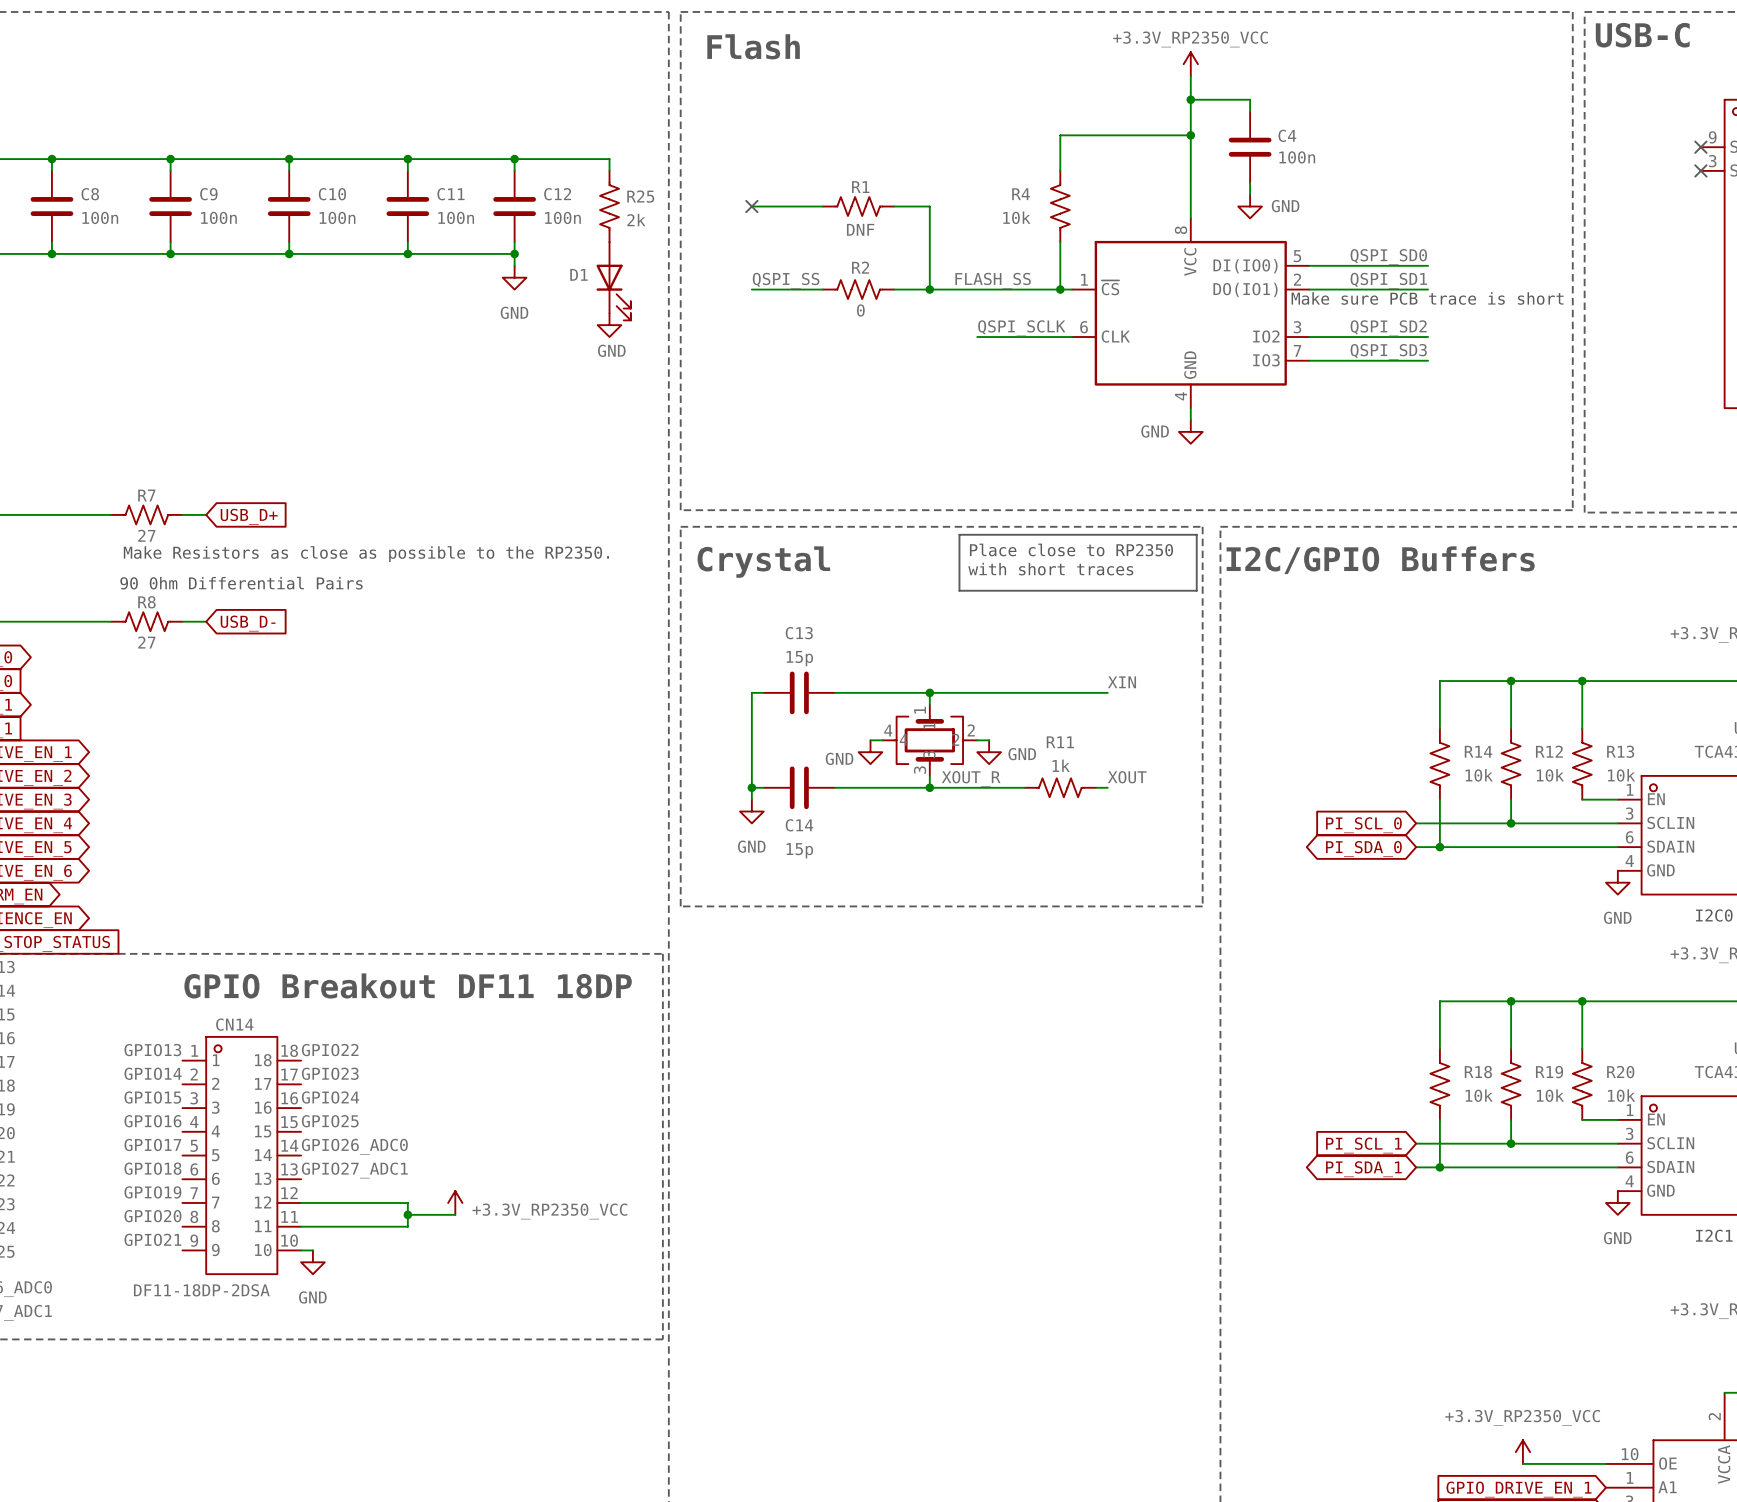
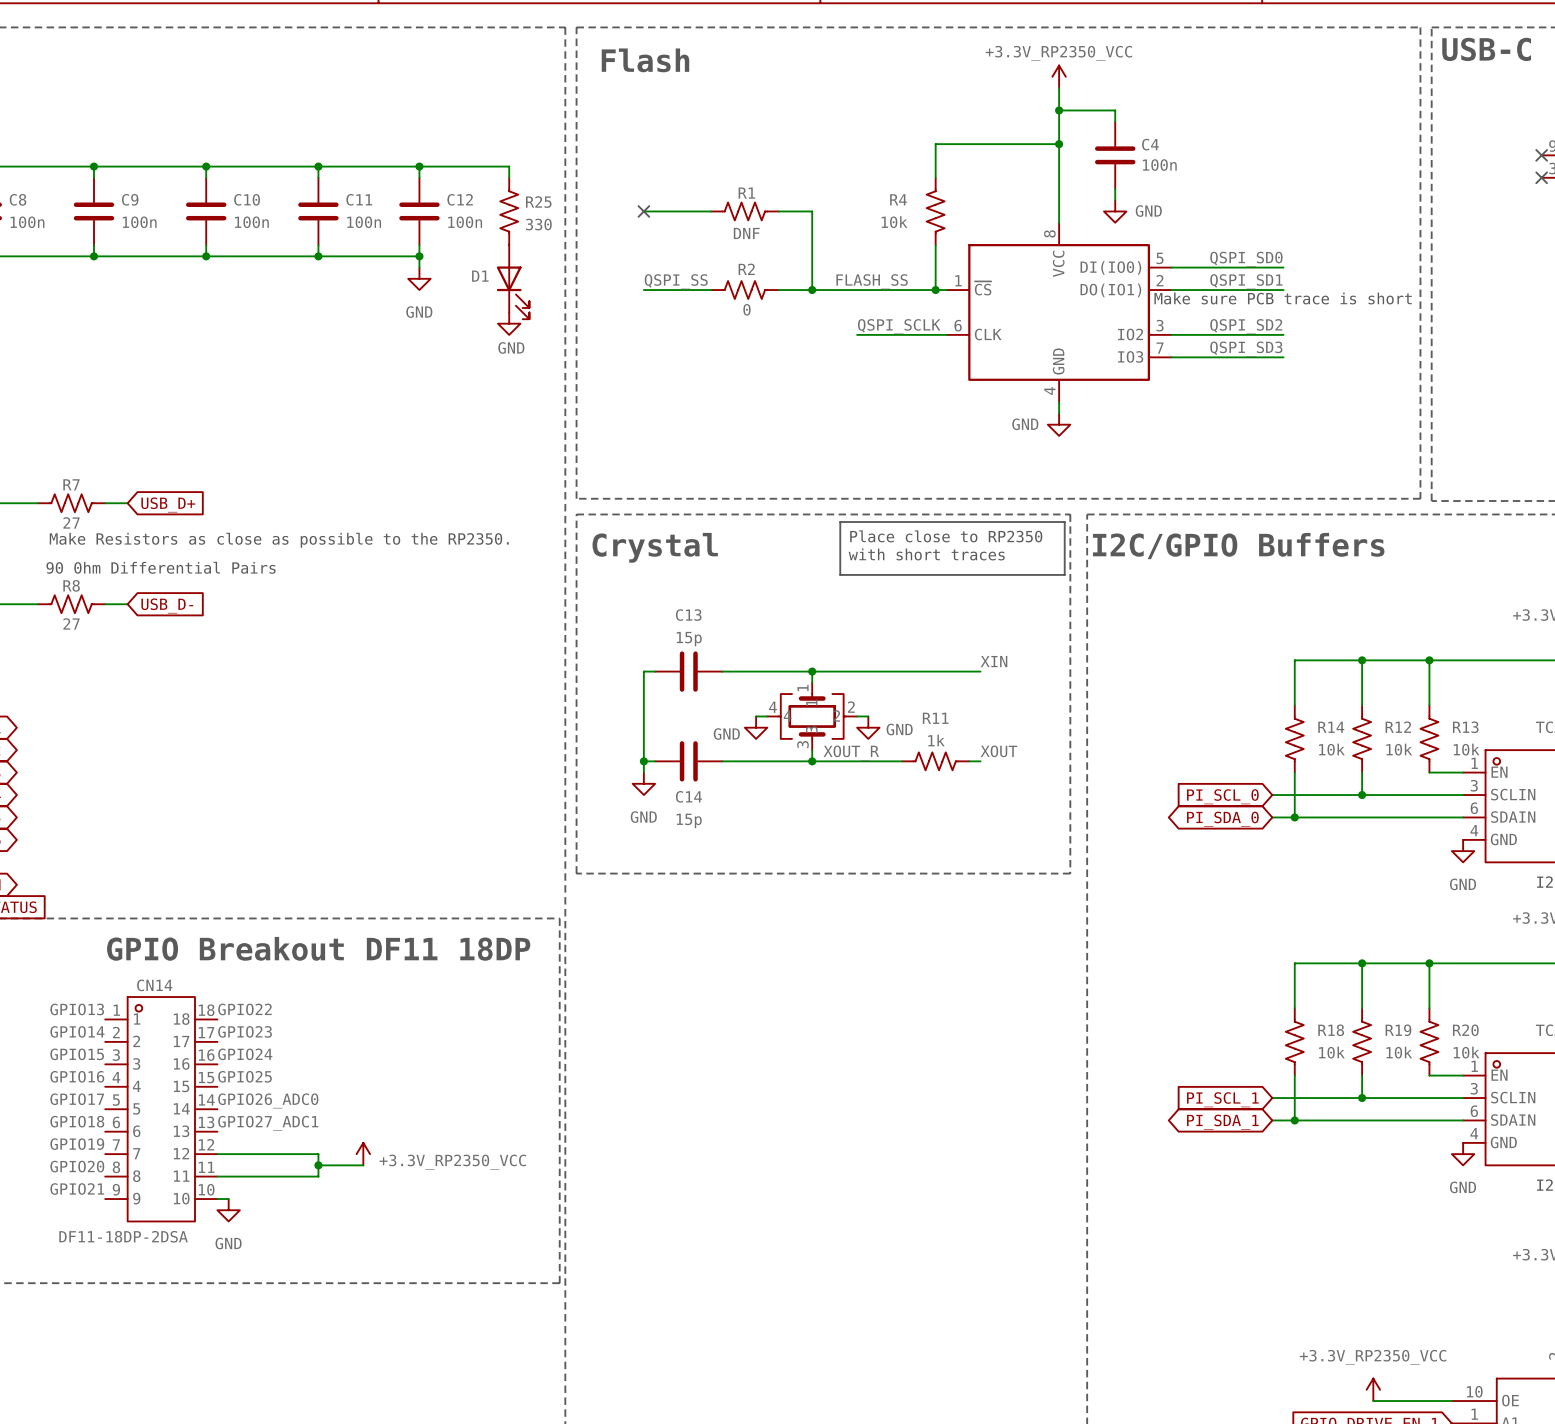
R25 value: 2k (636, 220) -> 330 (538, 224)

